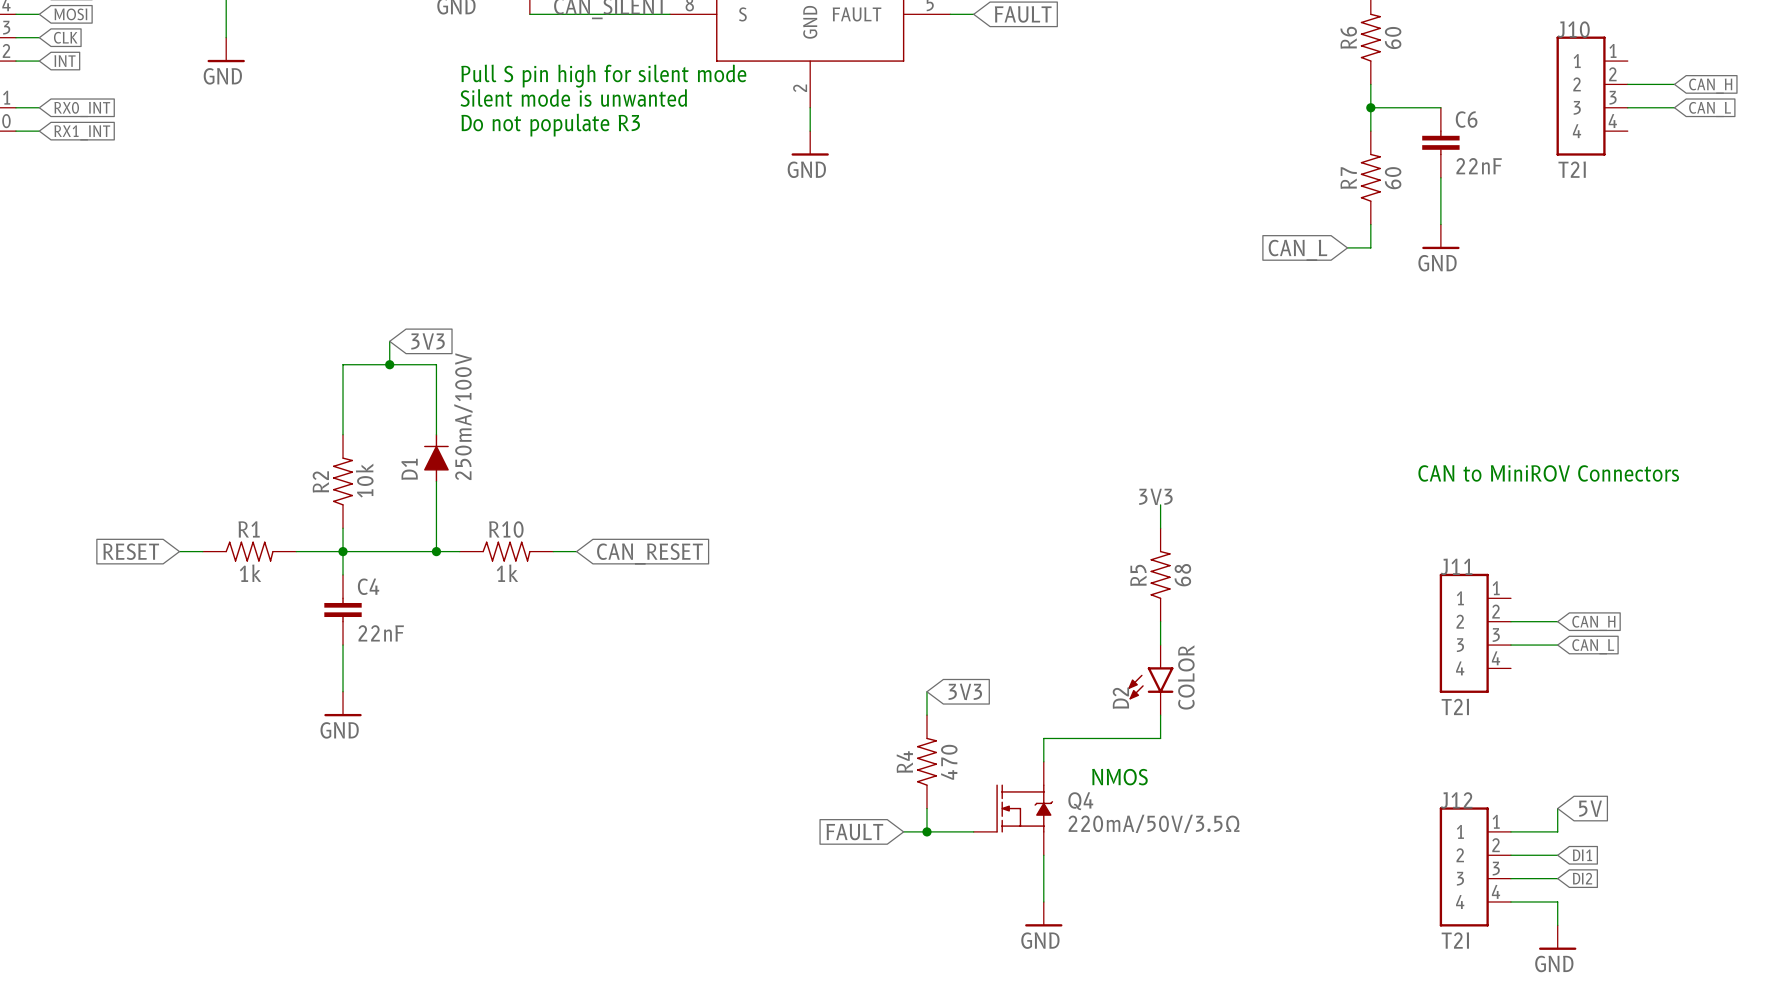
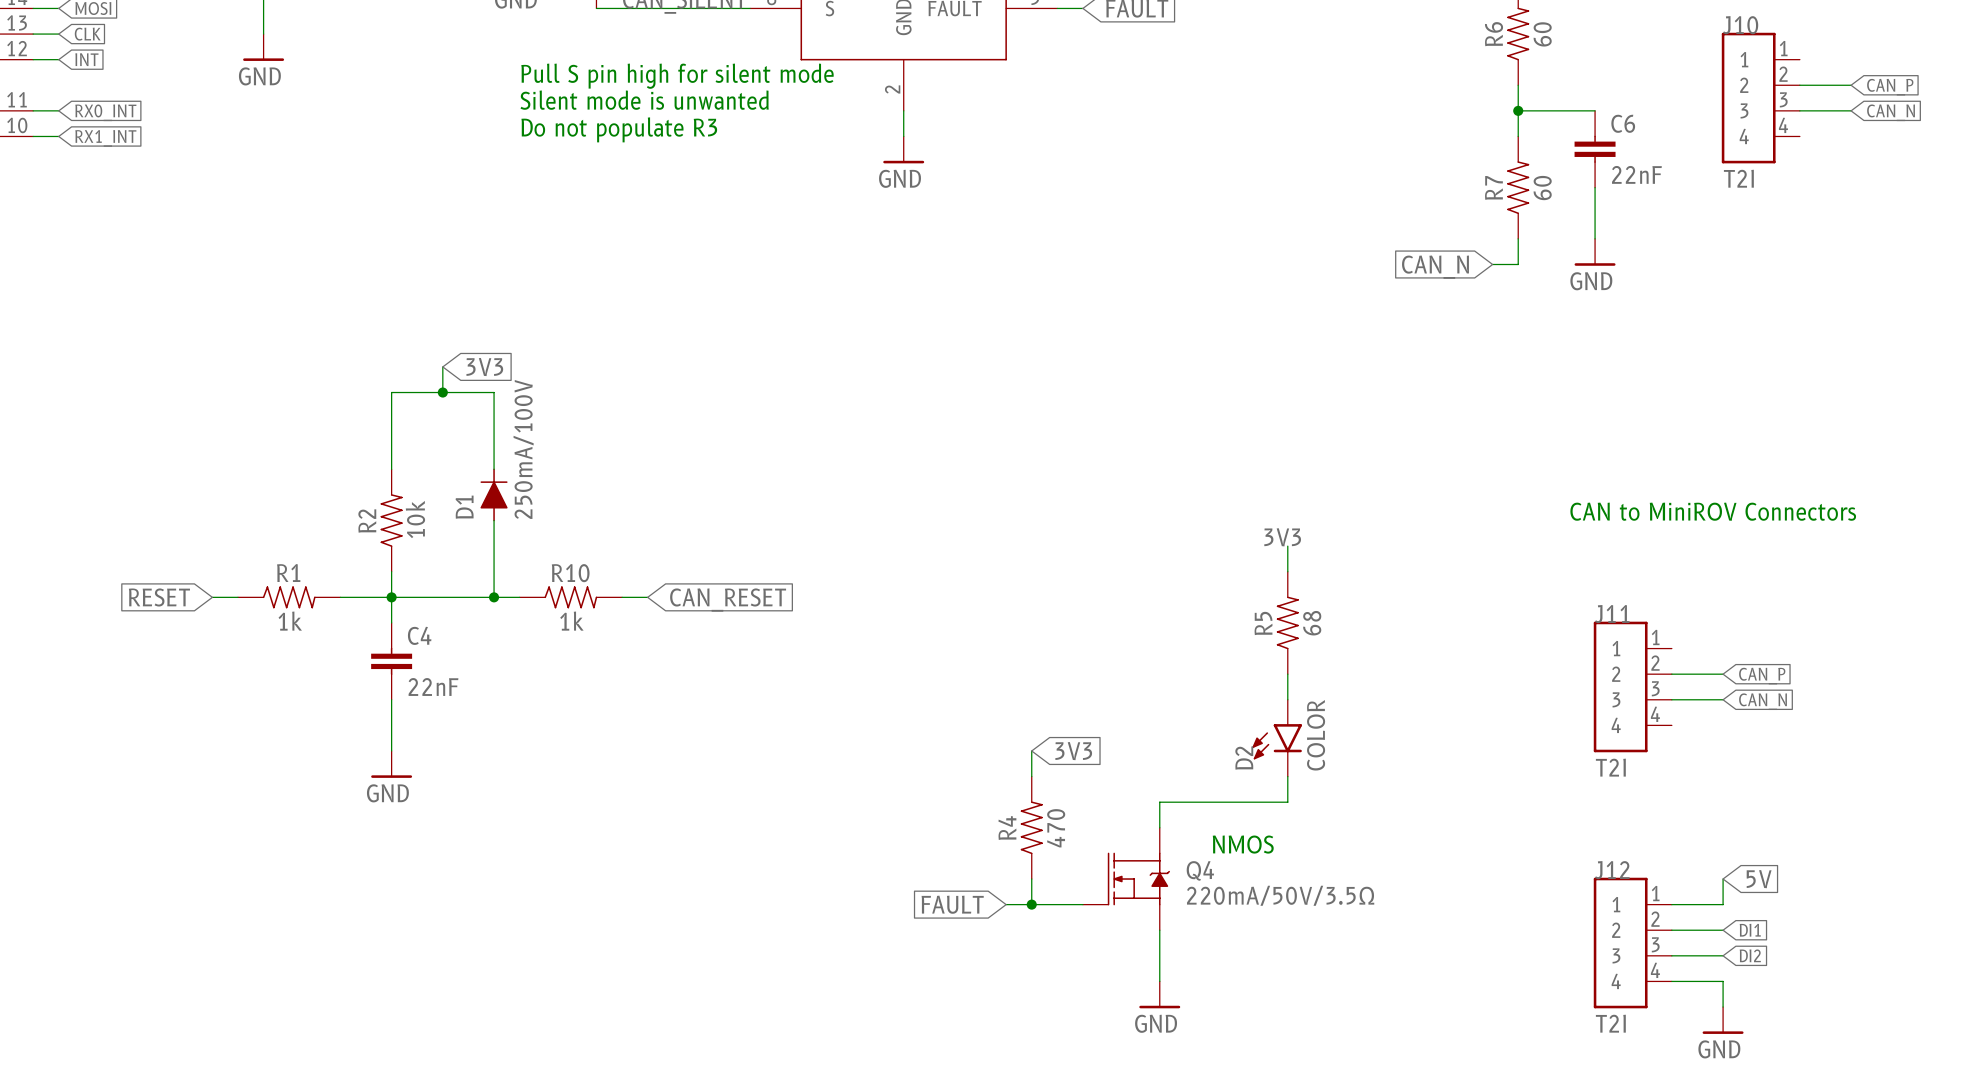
global label: CAN_H (1710, 86) -> CAN_P (1890, 87)
global label: CAN_L (1710, 109) -> CAN_N (1891, 112)
global label: CAN_L (1297, 250) -> CAN_N (1435, 267)
global label: CAN_H (1593, 623) -> CAN_P (1762, 676)
global label: CAN_L (1593, 646) -> CAN_N (1763, 701)

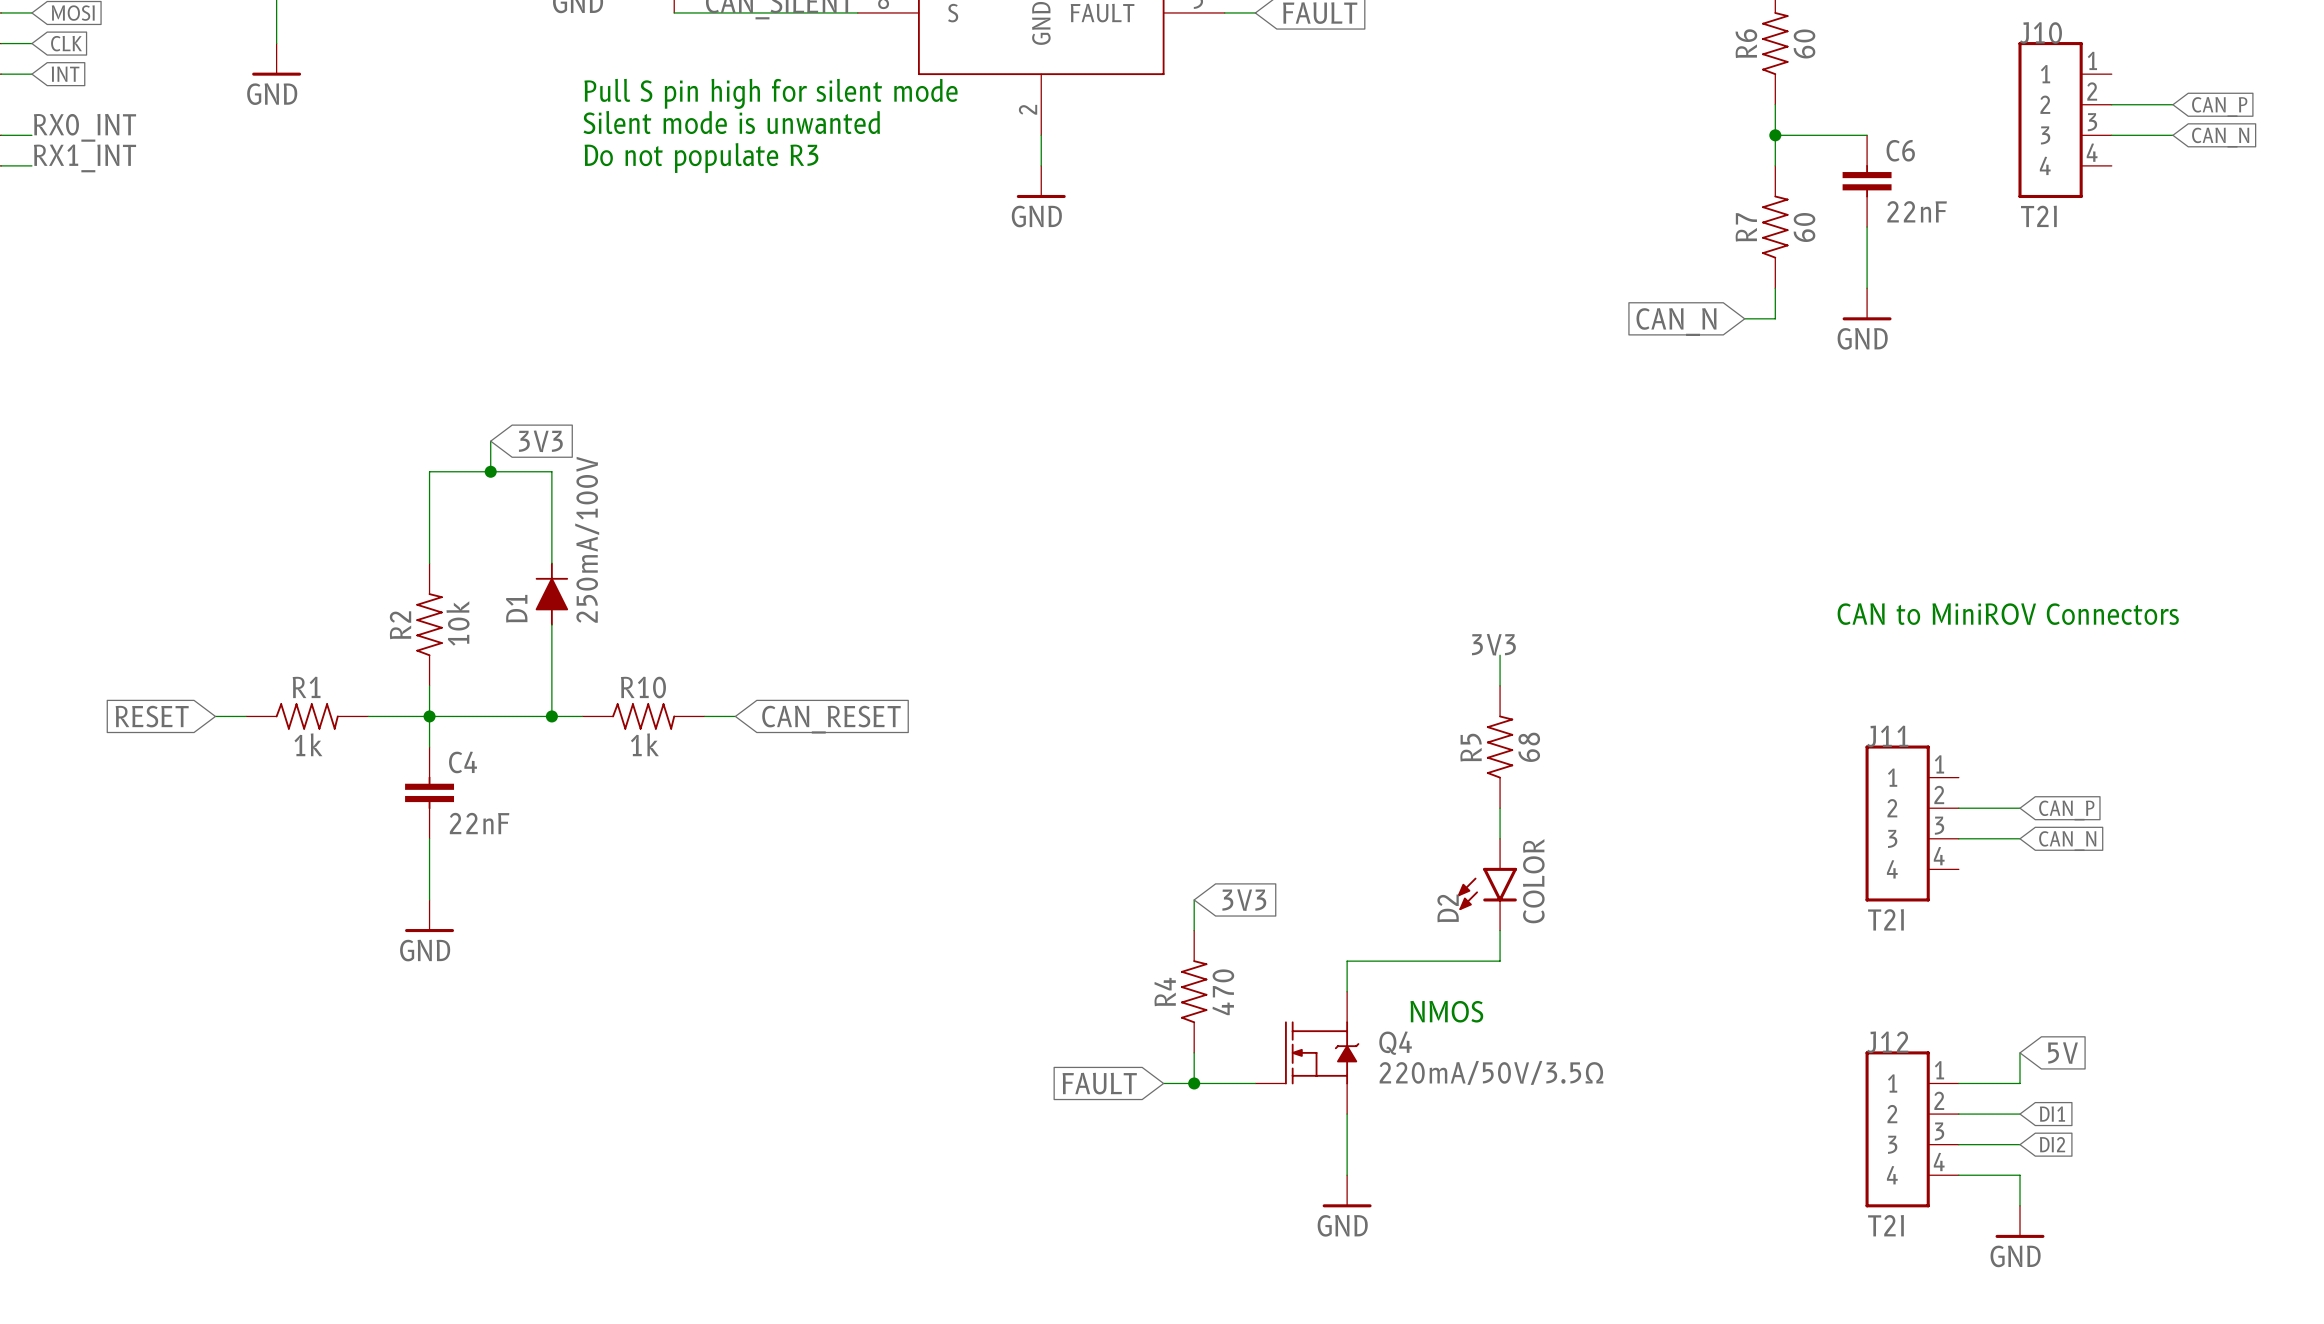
label: none -> RX0_INT (84, 127)
global label: RX0_INT (105, 112) -> none
label: none -> RX1_INT (84, 158)
global label: RX1_INT (105, 138) -> none

